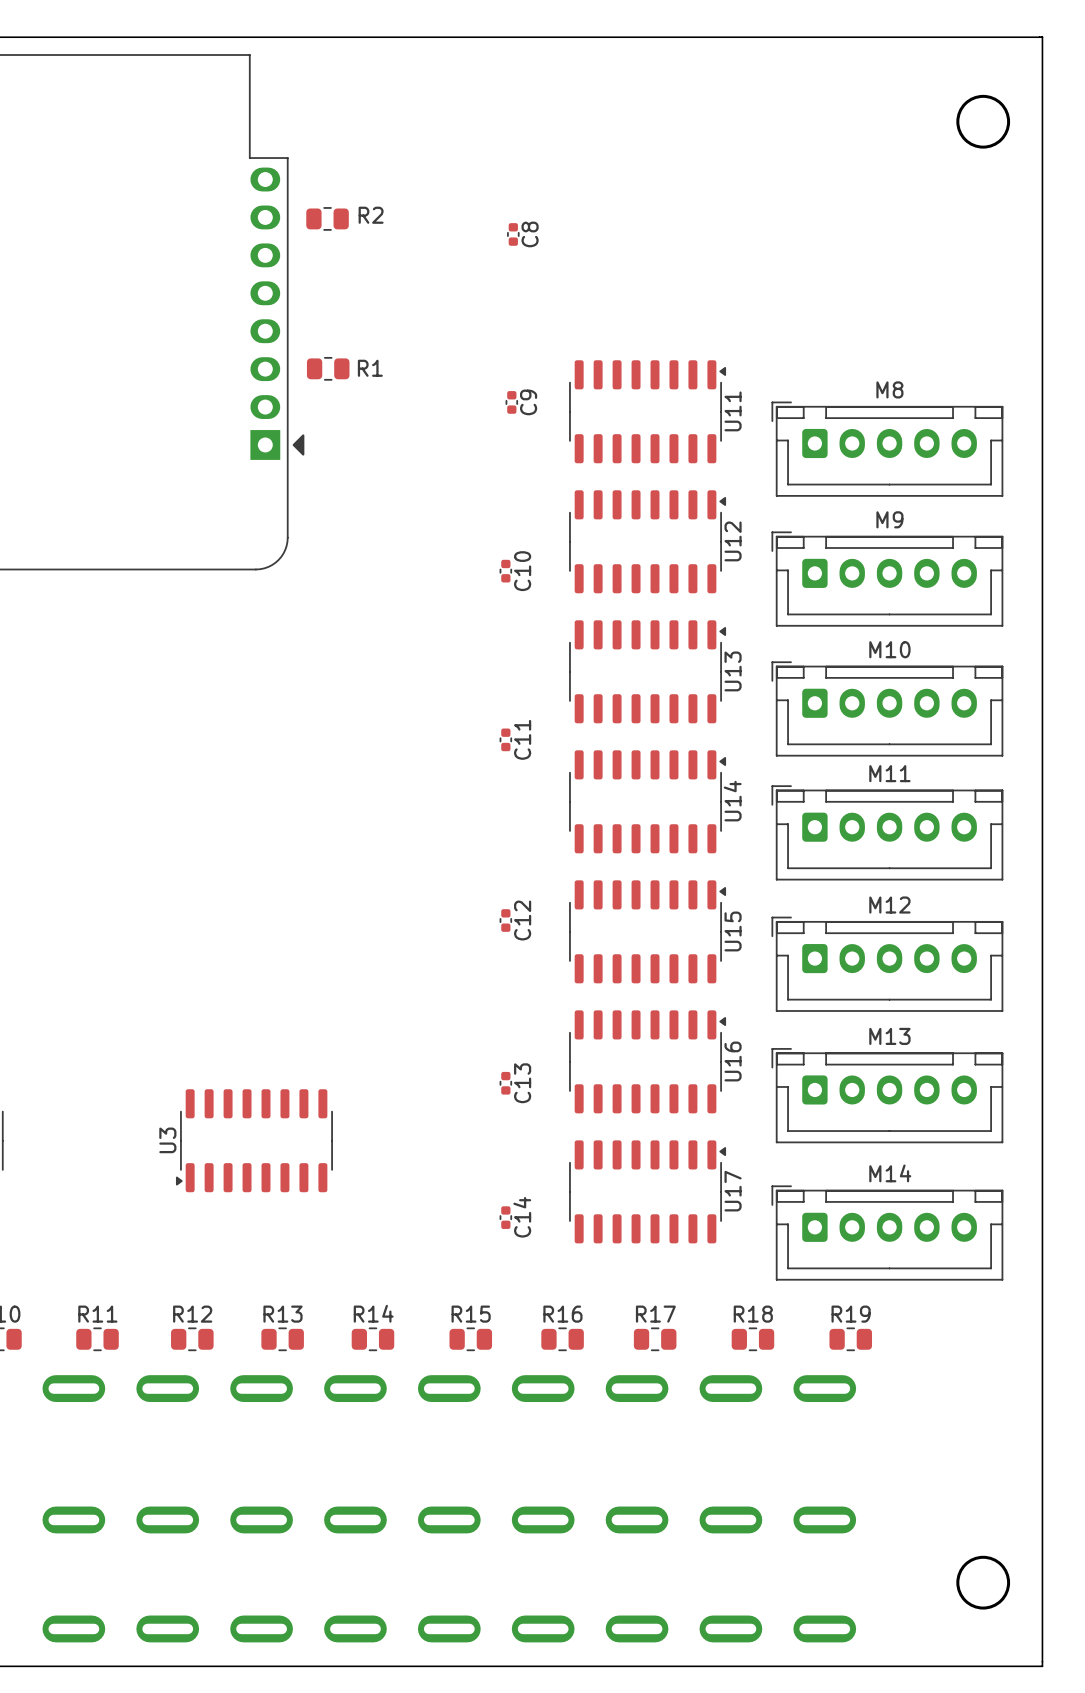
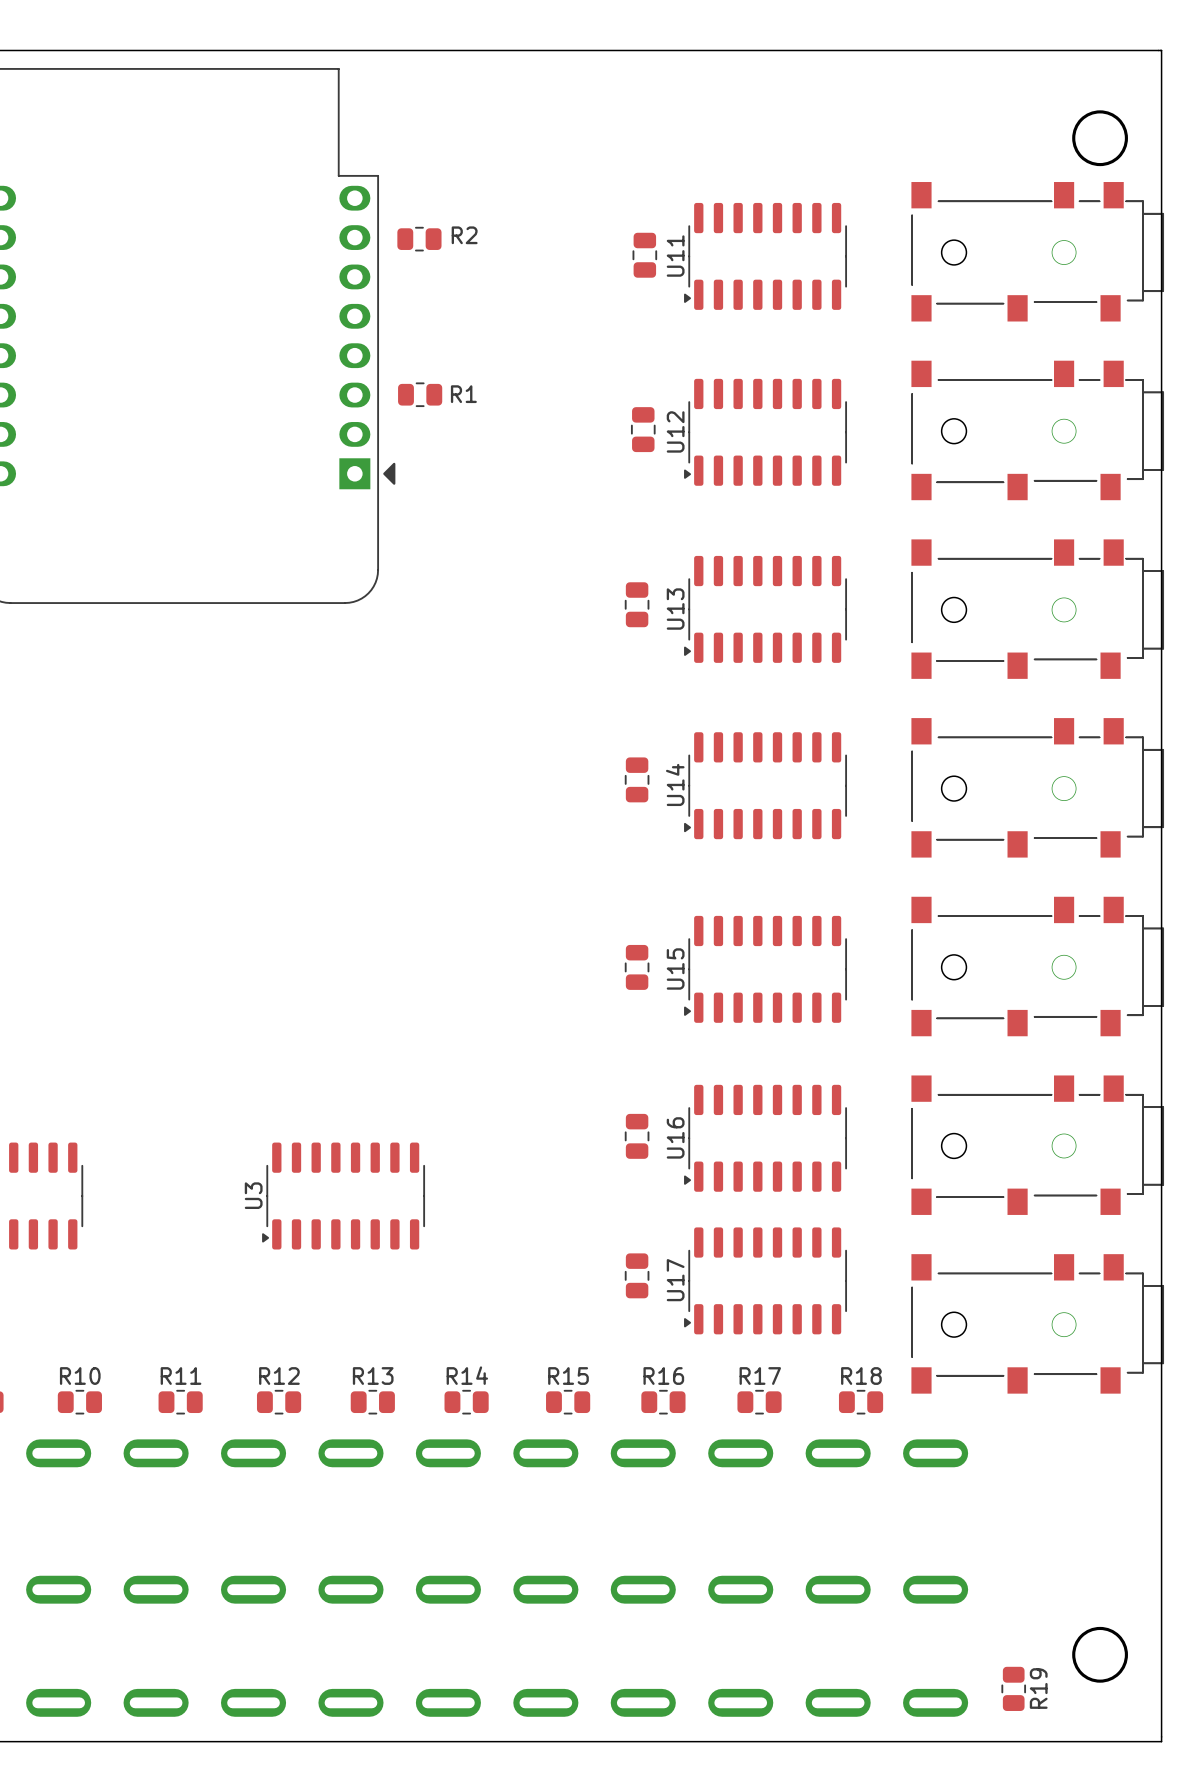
part: none -> (1037, 251)
C8: (513, 234) -> none
part: none -> (644, 255)
C9: (511, 402) -> none
part: none -> (643, 429)
part: none -> (1037, 430)
U11 rotation: 0° (647, 411) -> 180° (765, 256)
U11 position: (647, 411) -> (765, 256)
M8: (887, 449) -> none
U12 rotation: 0° (647, 541) -> 180° (765, 432)
U12 position: (647, 541) -> (765, 432)
C10: (505, 571) -> none
part: none -> (637, 604)
part: none -> (1037, 609)
M9: (887, 579) -> none
U13 rotation: 0° (647, 671) -> 180° (765, 609)
U13 position: (647, 671) -> (765, 609)
M10: (887, 708) -> none
C11: (505, 739) -> none
part: none -> (637, 779)
part: none -> (1037, 787)
U14 rotation: 0° (647, 801) -> 180° (765, 785)
M11: (887, 832) -> none
part: none -> (1037, 966)
C12: (505, 920) -> none
part: none -> (637, 967)
U15 rotation: 0° (647, 931) -> 180° (765, 969)
M12: (887, 964) -> none
U16 rotation: 0° (647, 1061) -> 180° (765, 1138)
C13: (505, 1083) -> none
part: none -> (637, 1136)
part: none -> (1037, 1145)
M13: (887, 1095) -> none
U17 rotation: 0° (647, 1191) -> 180° (765, 1280)
C14: (505, 1217) -> none
part: none -> (637, 1275)
M14: (887, 1233) -> none
part: none -> (1037, 1323)
R19 rotation: 0° (850, 1339) -> 90° clockwise (1013, 1688)
R19 position: (850, 1339) -> (1013, 1688)

